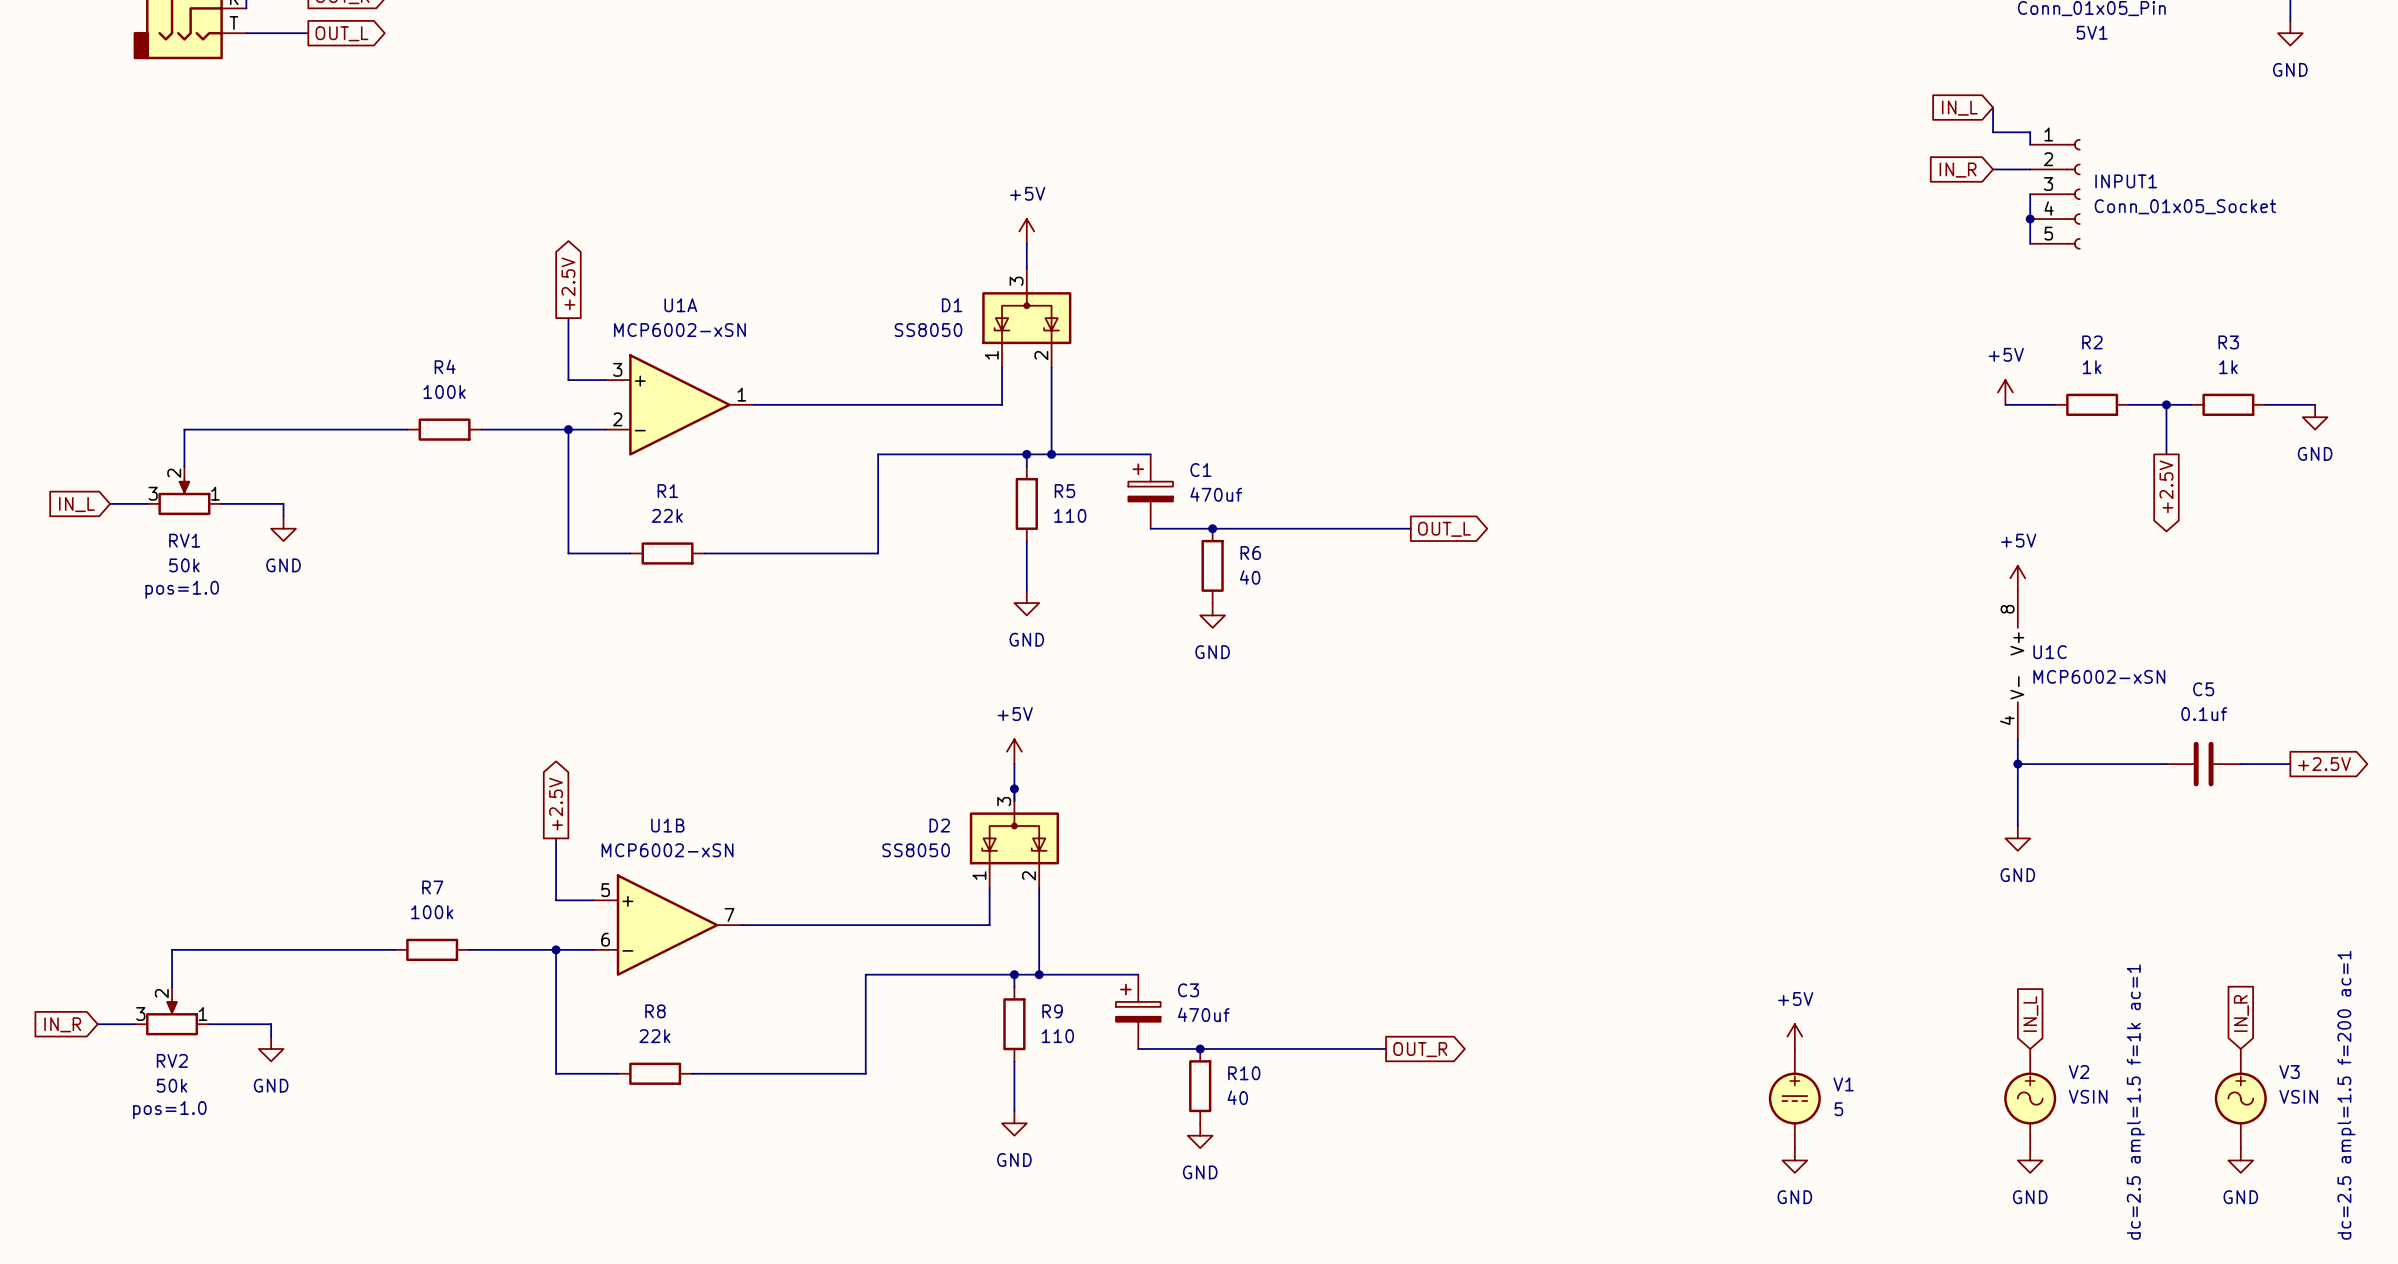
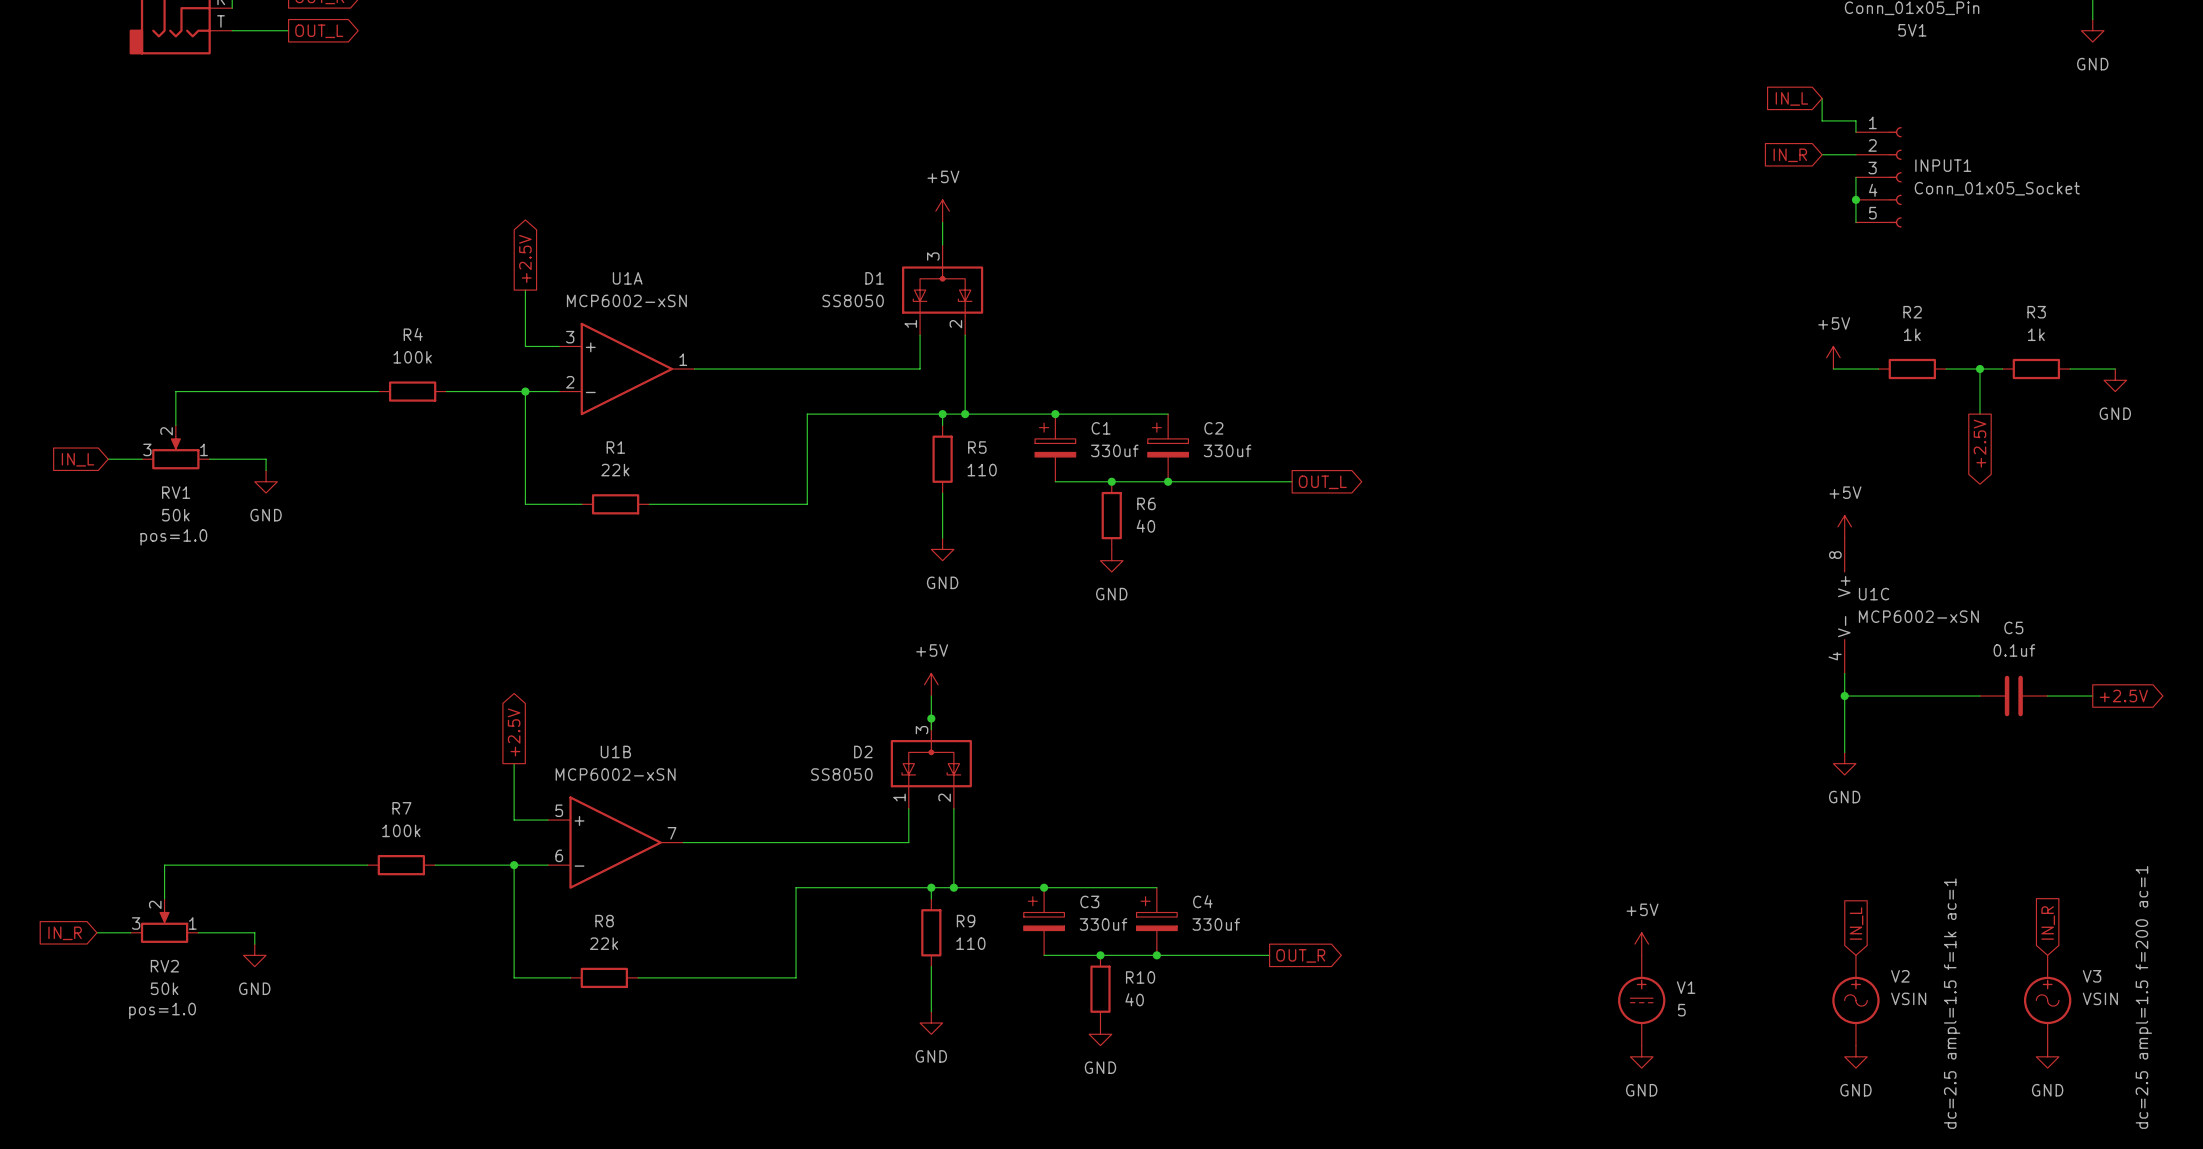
wire: none -> (1055, 414) (1168, 414)
junction: none -> (1055, 414)
C2: none -> 330uf (1168, 447)
C1 value: 470uf (1216, 494) -> 330uf (1114, 450)
junction: none -> (1168, 481)
wire: none -> (1044, 887) (1156, 887)
junction: none -> (1044, 887)
C4: none -> 330uf (1156, 921)
C3 value: 470uf (1203, 1014) -> 330uf (1103, 924)
junction: none -> (1156, 955)

